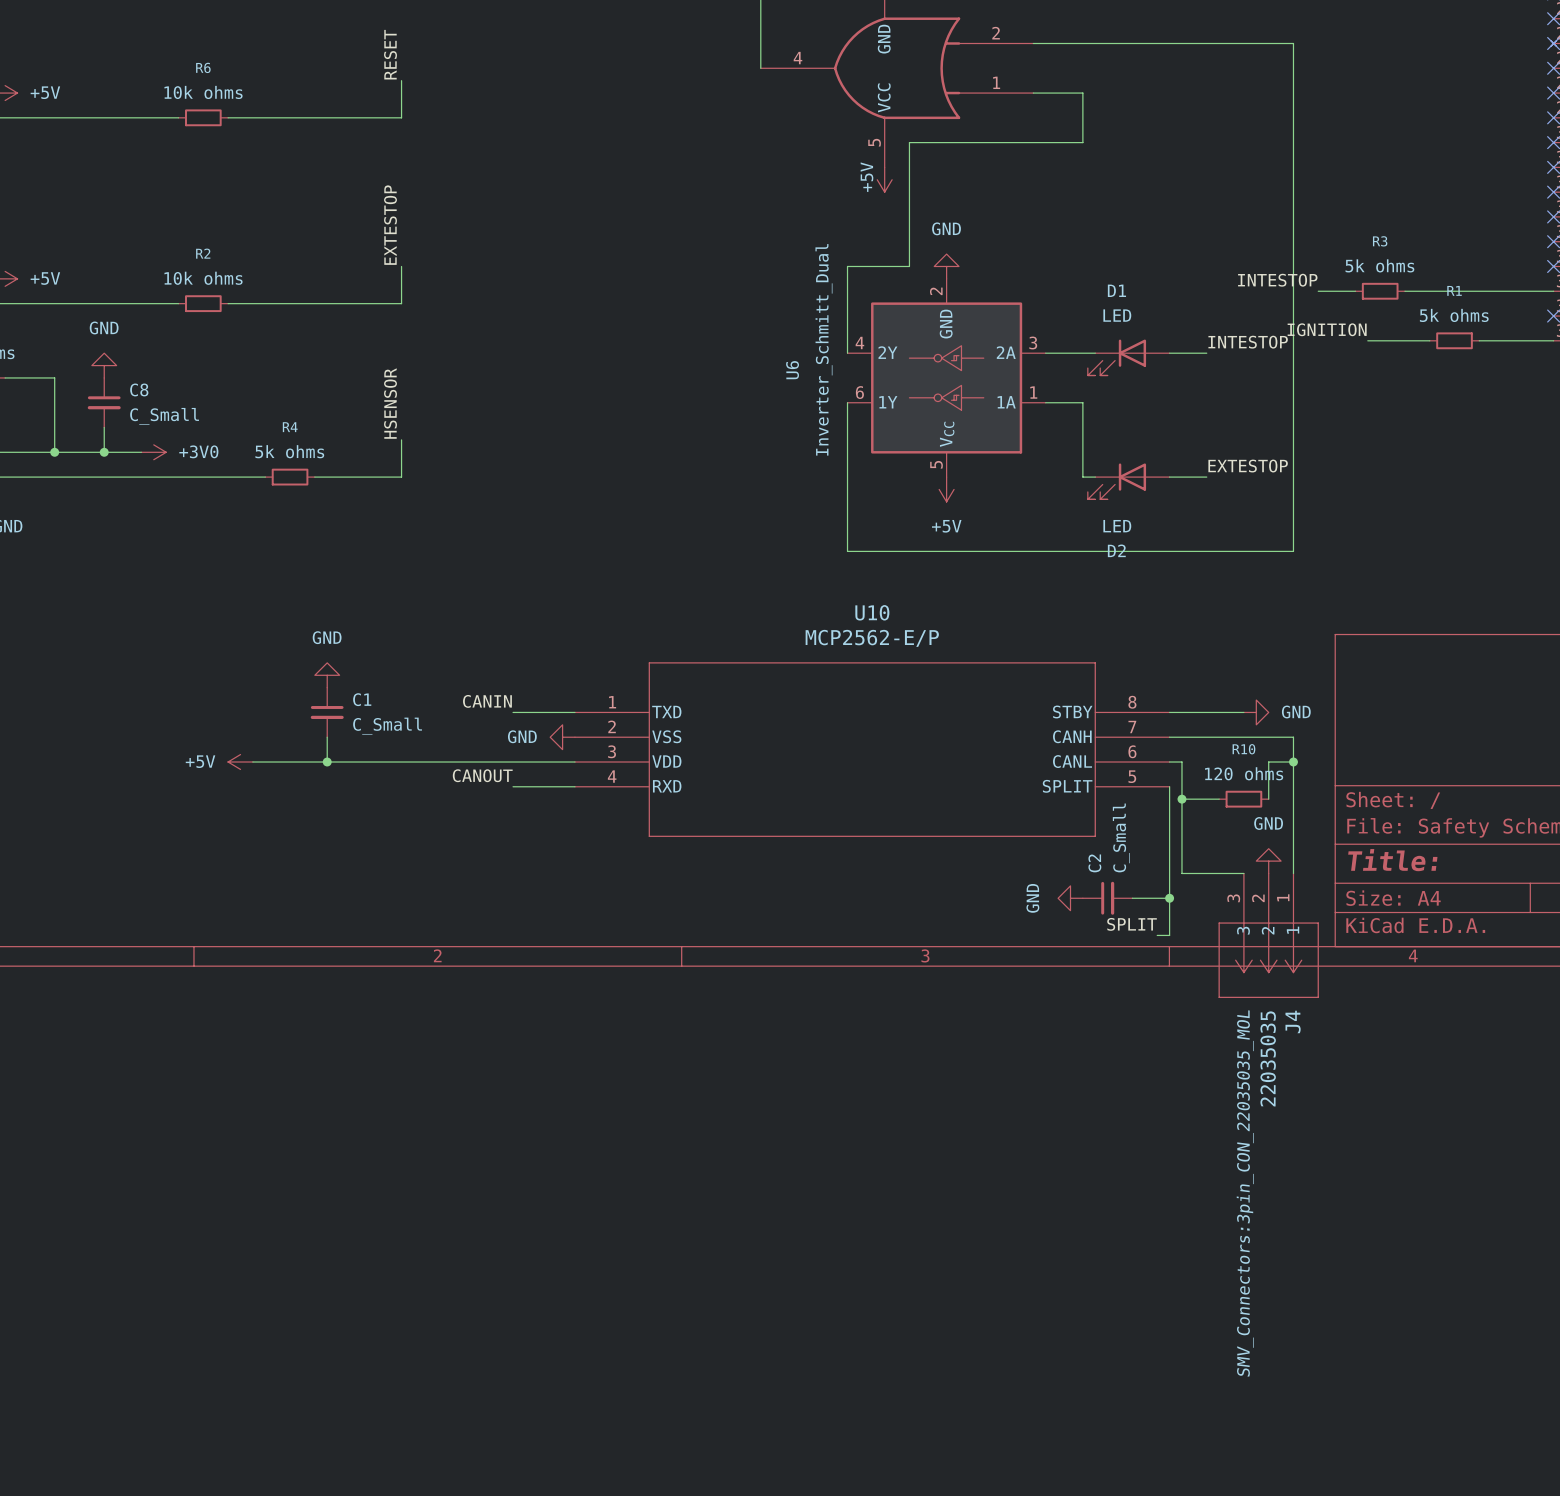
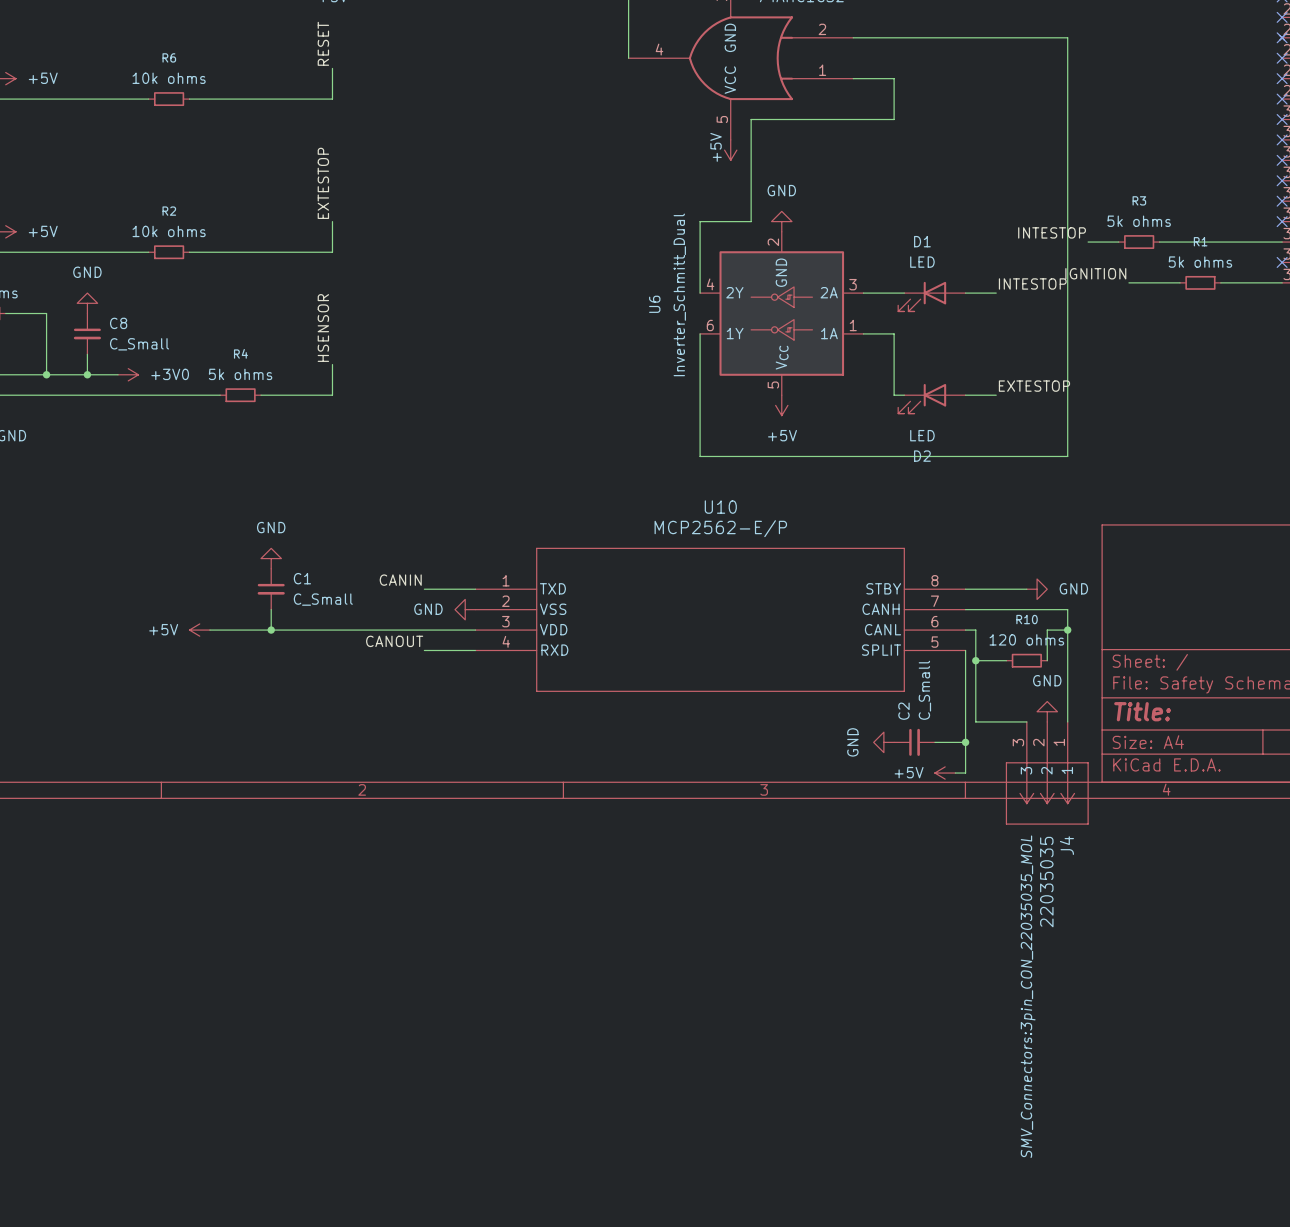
label: SPLIT (1132, 924) -> none
power symbol: none -> +5V (945, 773)

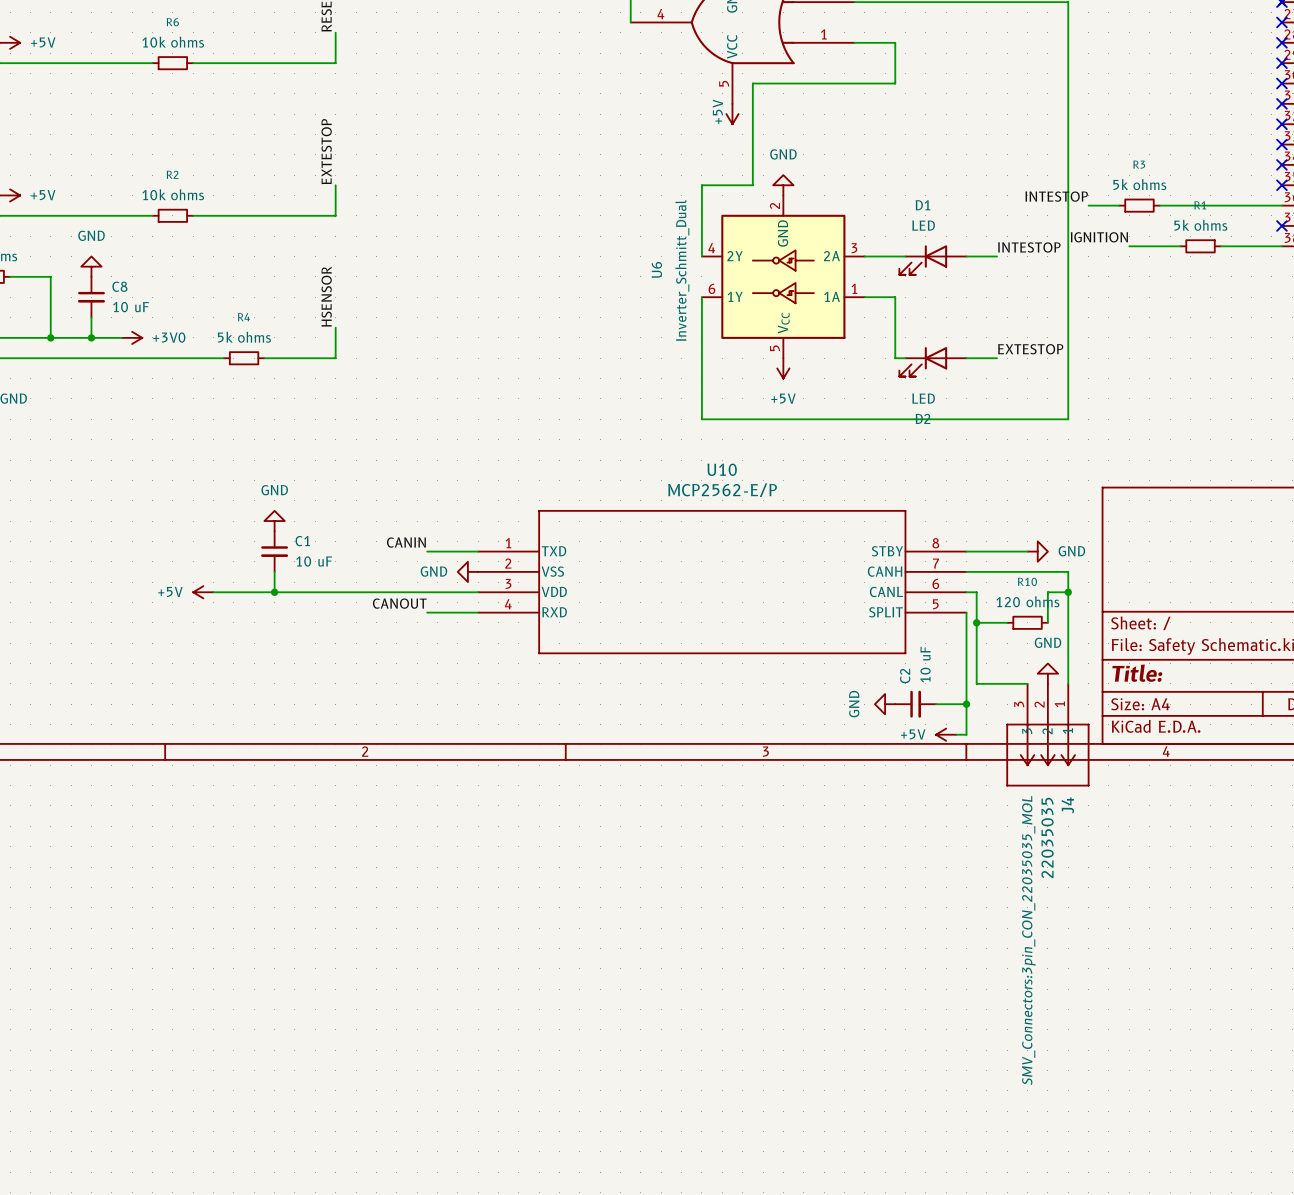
C8 value: C_Small (139, 344) -> 10 uF (131, 307)
C1 value: C_Small (323, 599) -> 10 uF (314, 561)
C2 value: C_Small (924, 690) -> 10 uF (925, 664)

